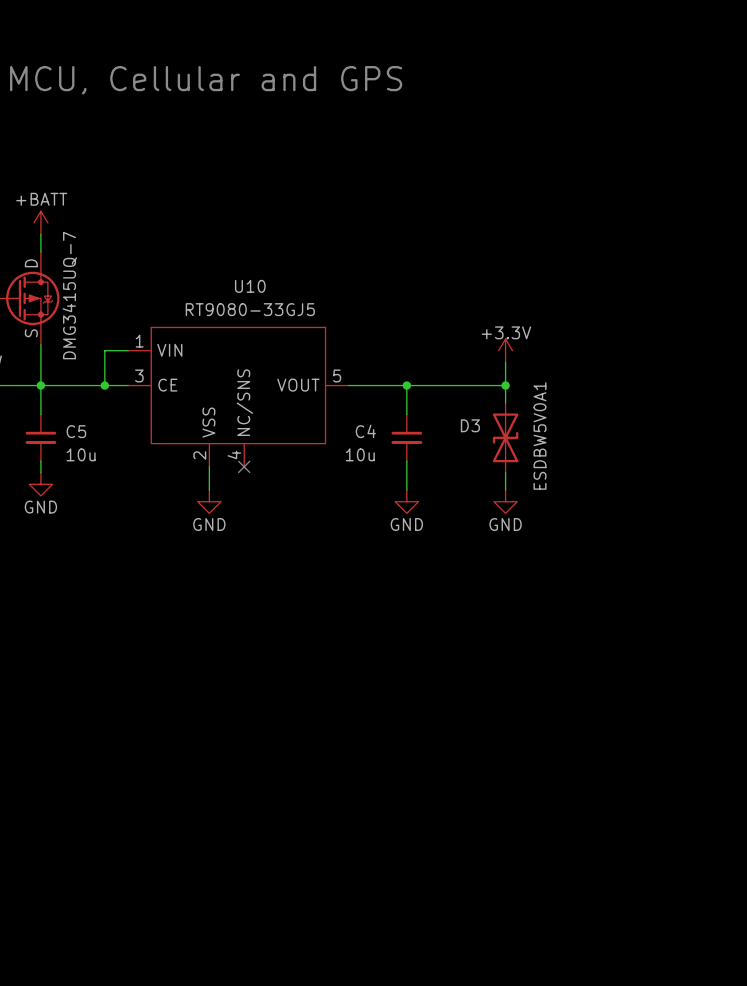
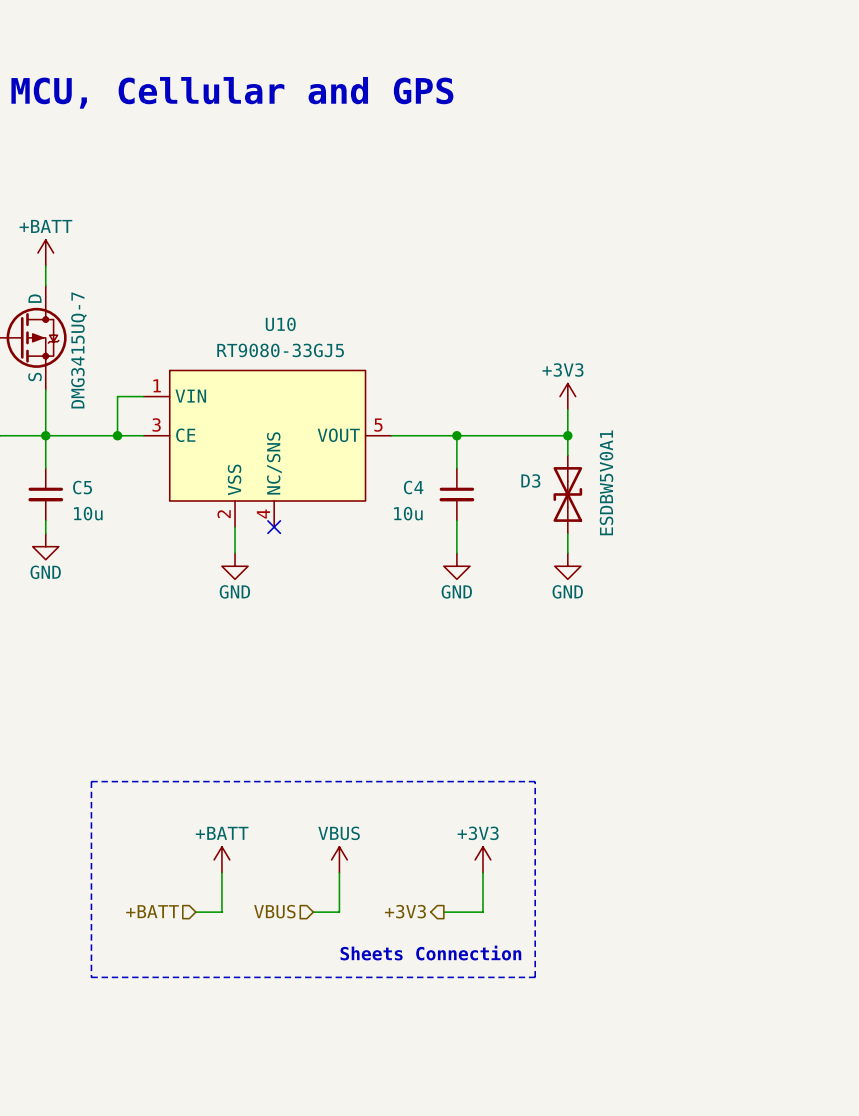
power symbol: +3.3V (505, 350) -> +3V3 (567, 396)
line: none -> (91, 781) (535, 781) (535, 977) (91, 977) (91, 781)
power symbol: none -> +BATT (221, 859)
power symbol: none -> VBUS (339, 859)
power symbol: none -> +3V3 (482, 859)
wire: none -> (221, 872) (221, 912) (195, 912)
wire: none -> (339, 872) (339, 912) (313, 912)
wire: none -> (482, 872) (482, 912) (443, 912)
hierarchical label: none -> +BATT (152, 911)
hierarchical label: none -> VBUS (274, 911)
hierarchical label: none -> +3V3 (405, 911)
text: none -> Sheets Connection (430, 953)

